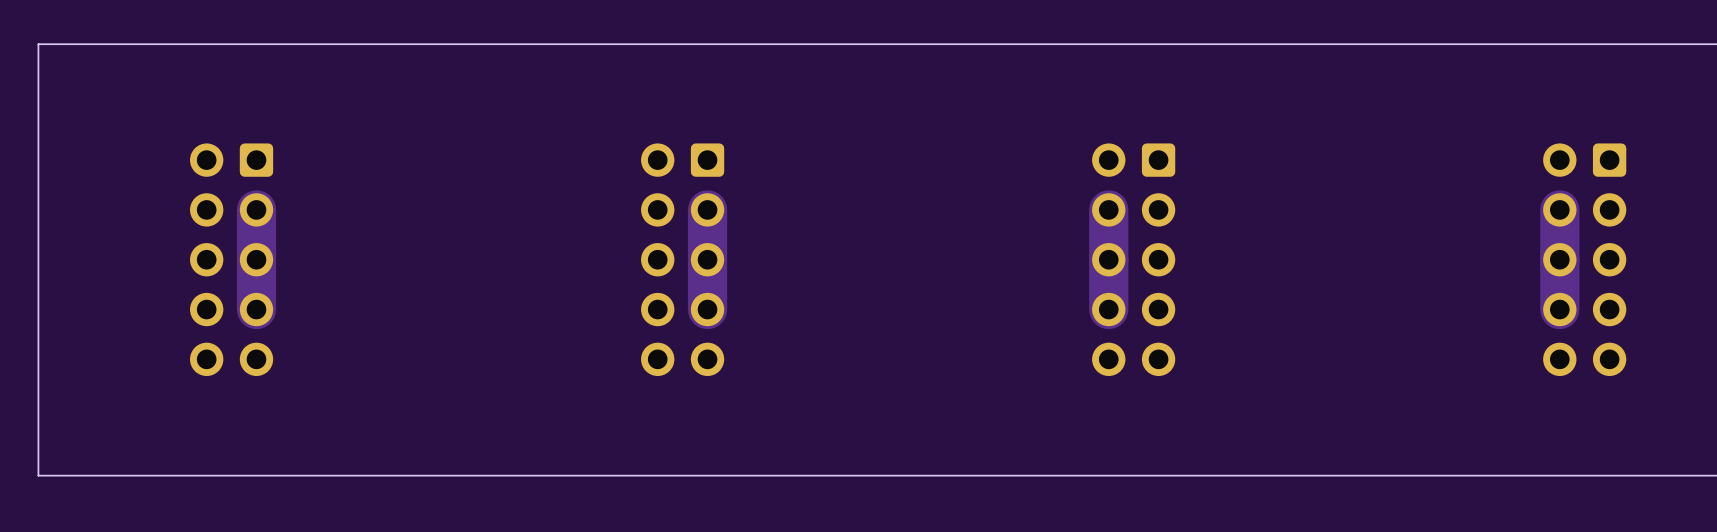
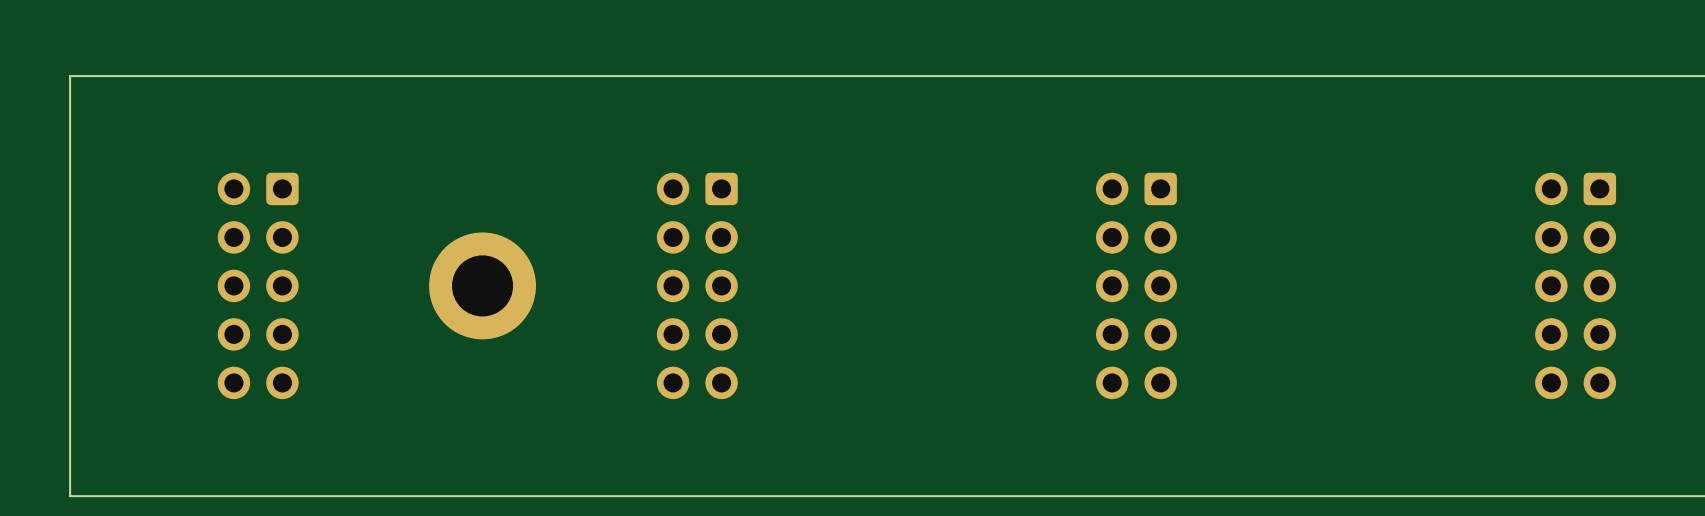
track: (256, 209) (256, 309) -> none
track: (707, 209) (707, 309) -> none
track: (1108, 209) (1108, 309) -> none
track: (1559, 209) (1559, 309) -> none
part: none -> (482, 285)

